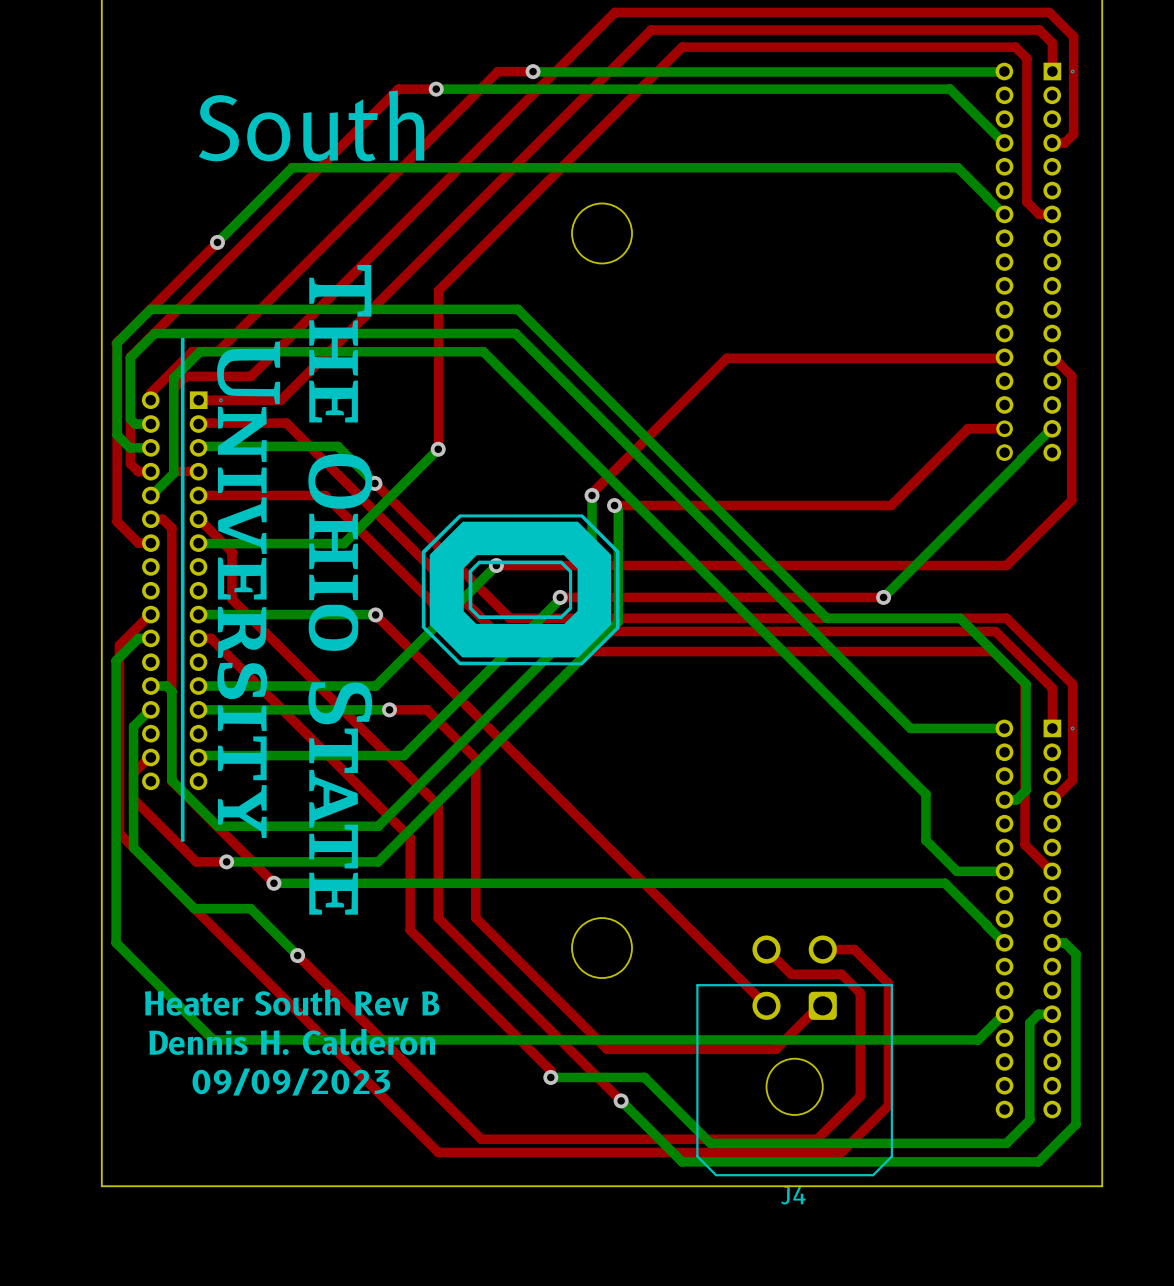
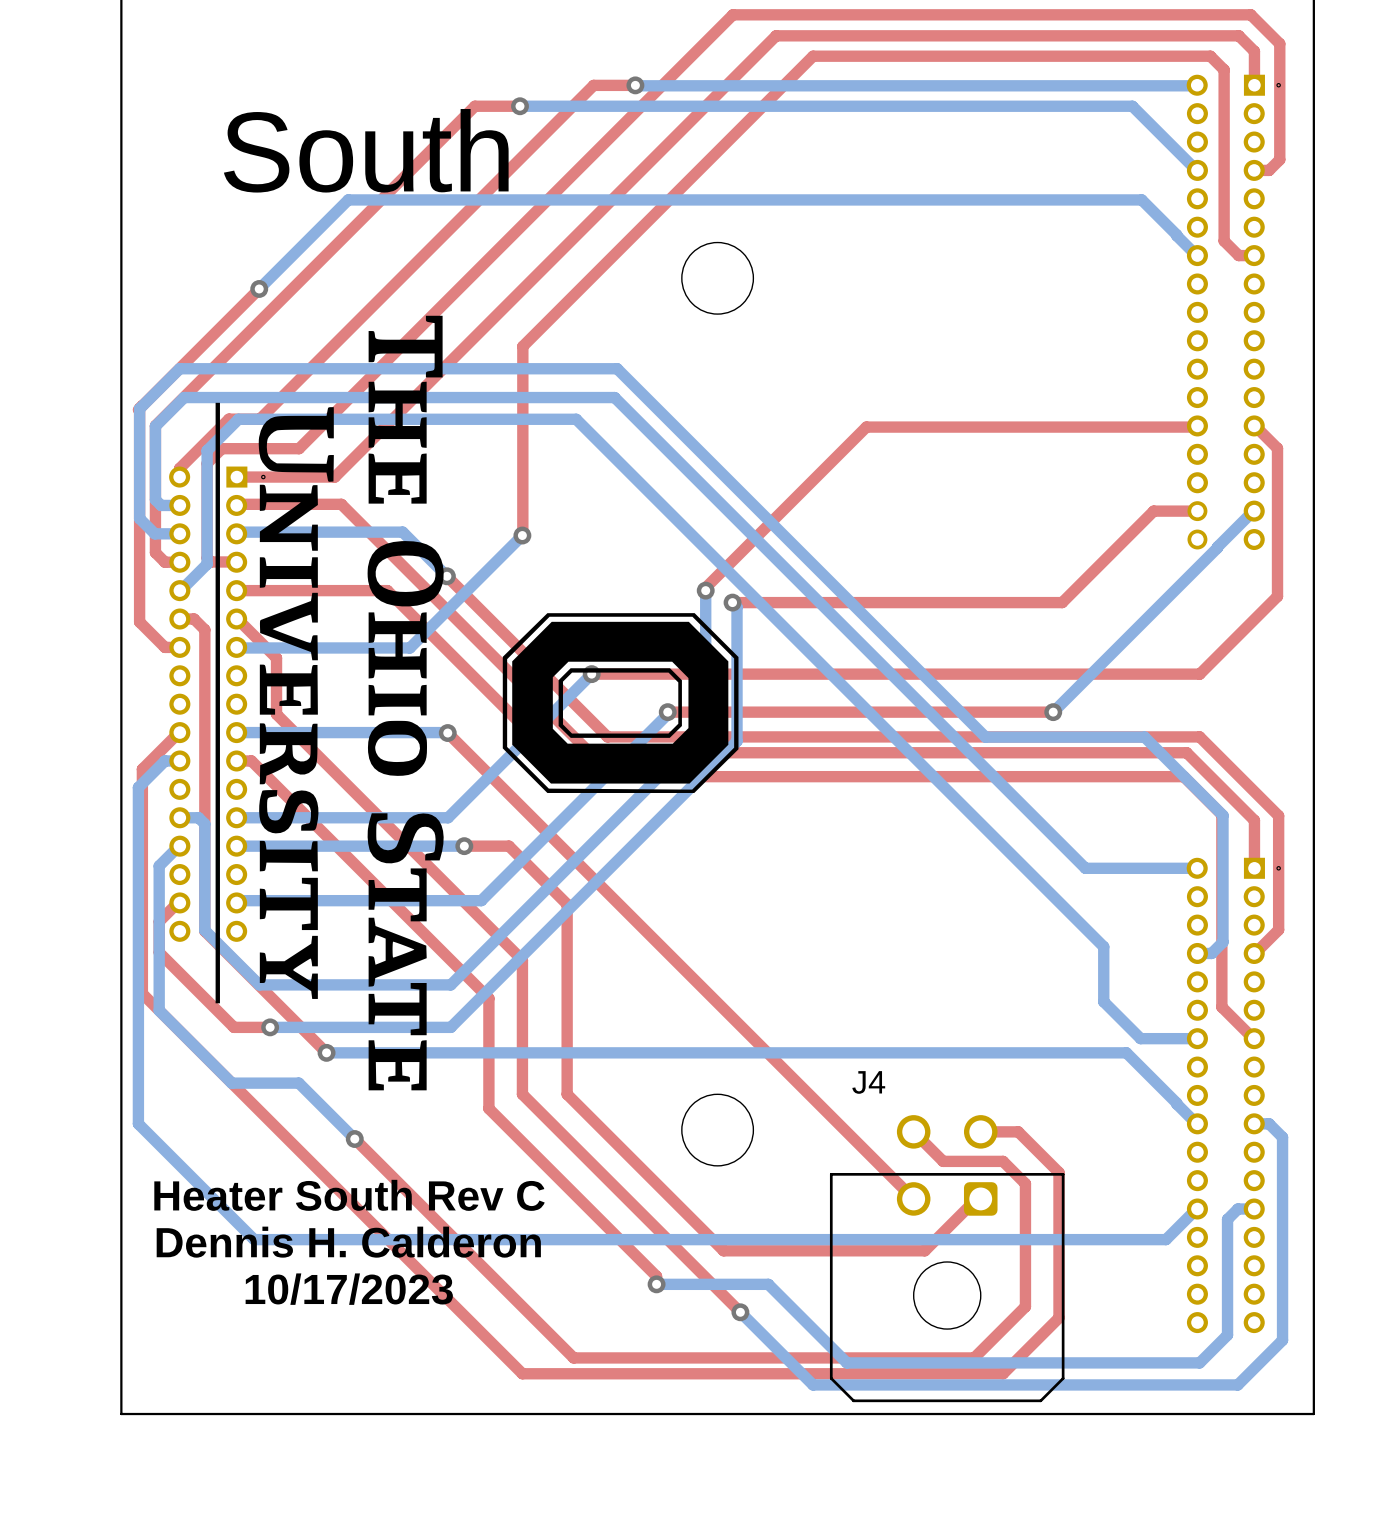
text: Heater South Rev B (292, 1002) -> Heater South Rev C (349, 1195)
text: 09/09/2023 (291, 1082) -> 10/17/2023 (349, 1289)
J4 name position: J4 (793, 1195) -> J4 (868, 1082)

